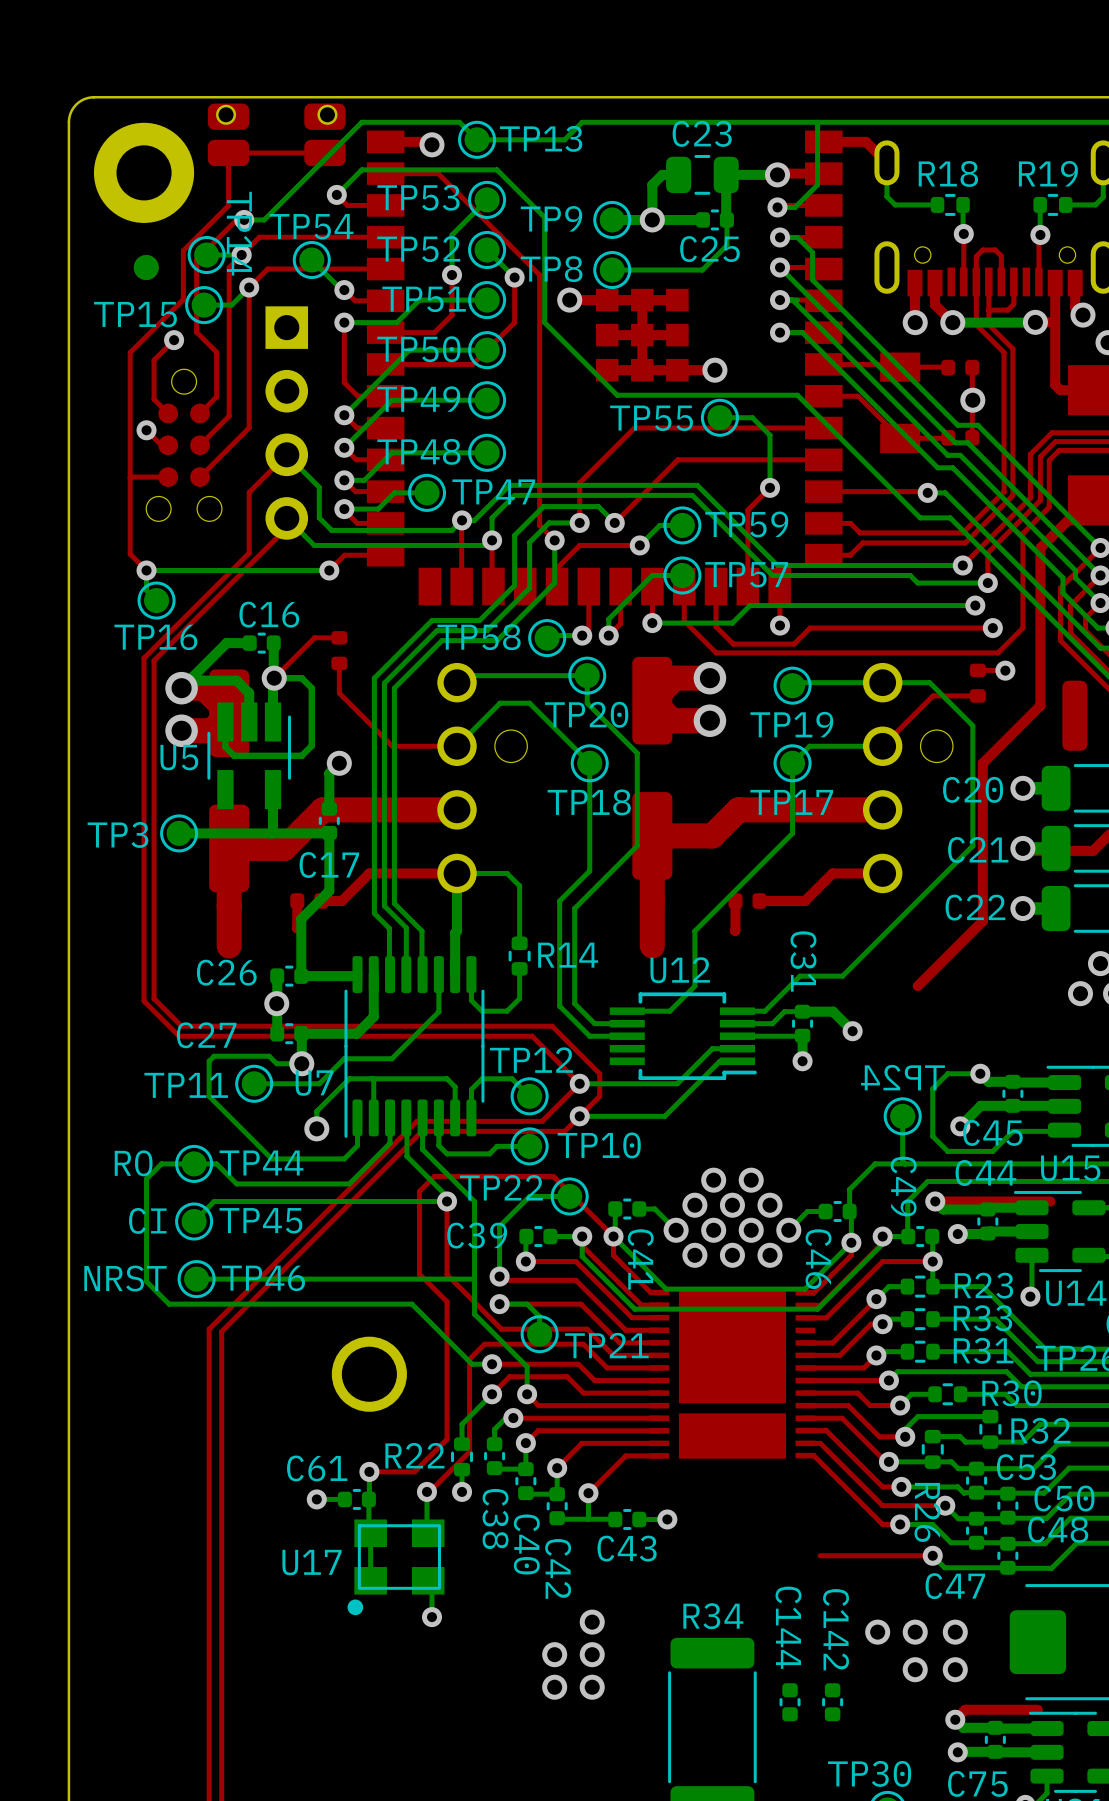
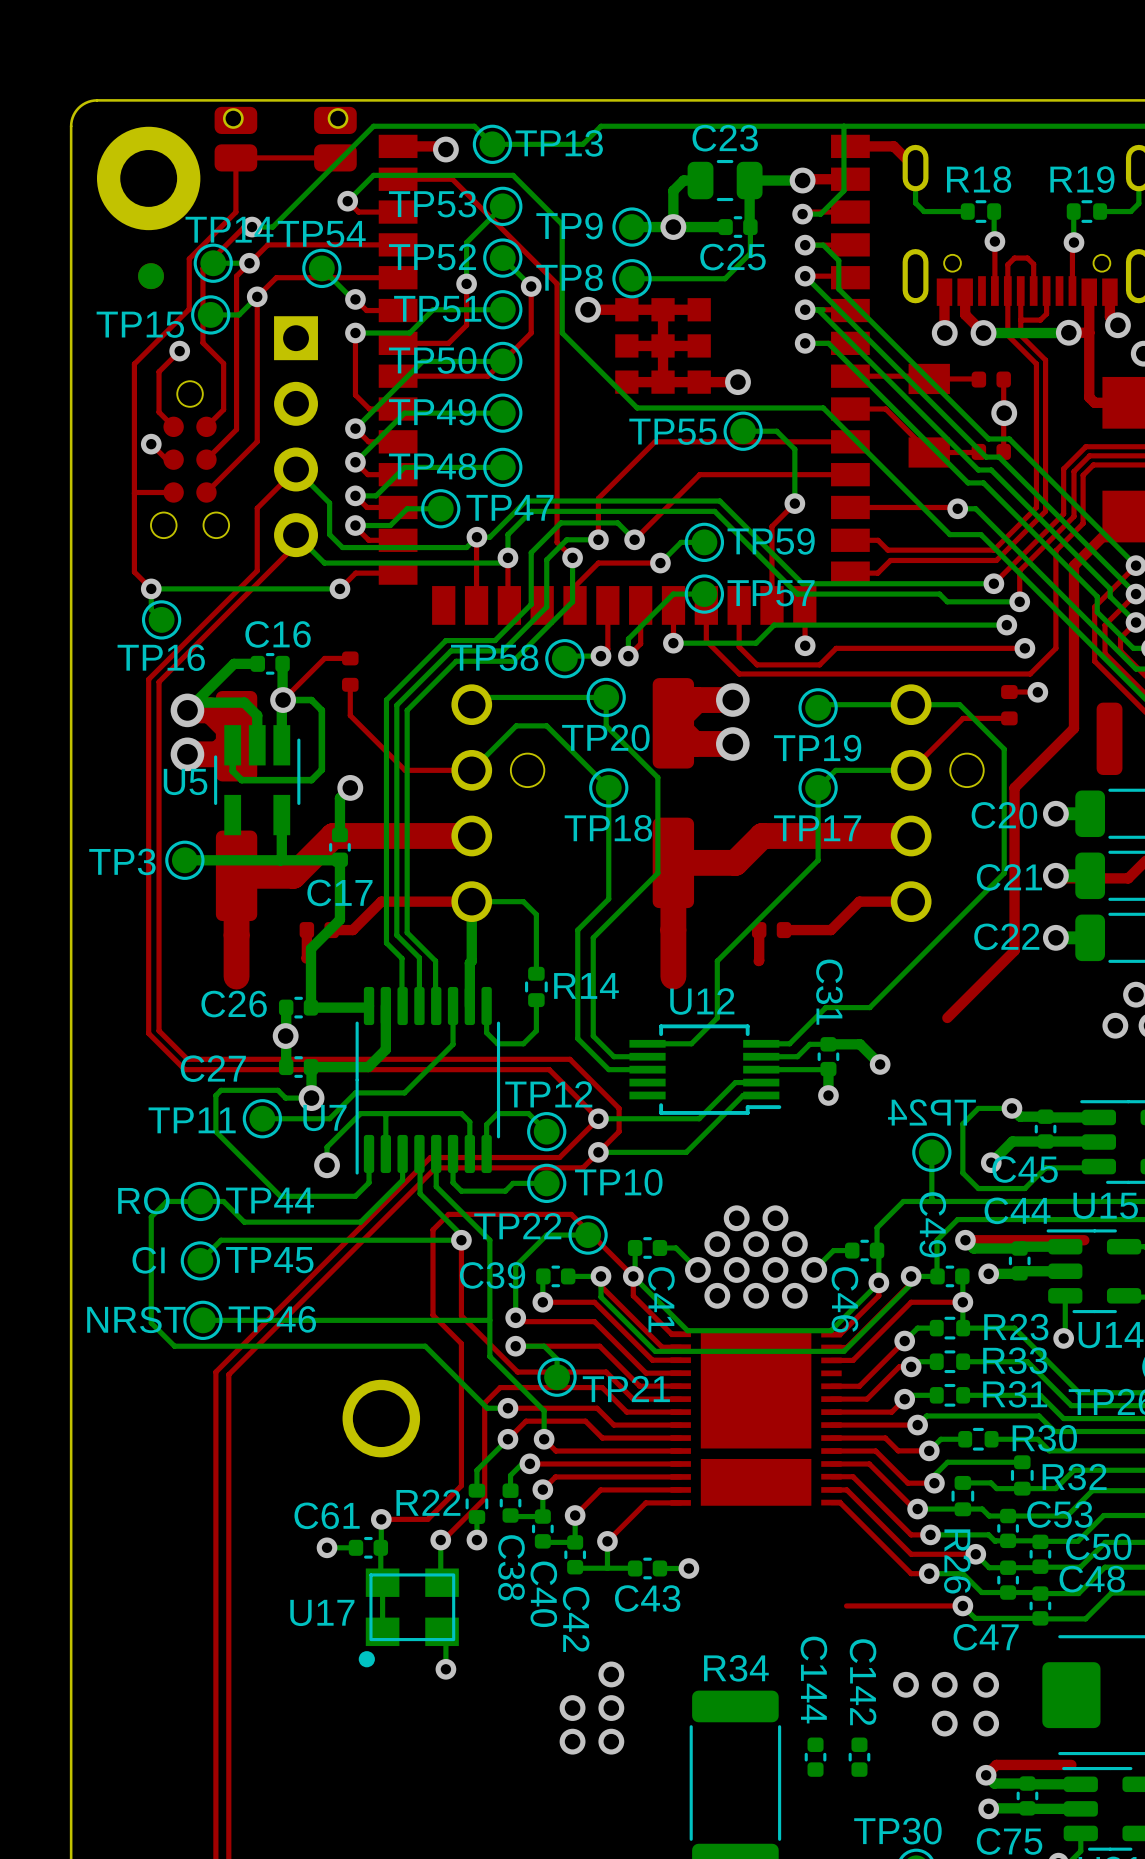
TP14 name rotation: 0° (239, 233) -> 90° counterclockwise (229, 229)

